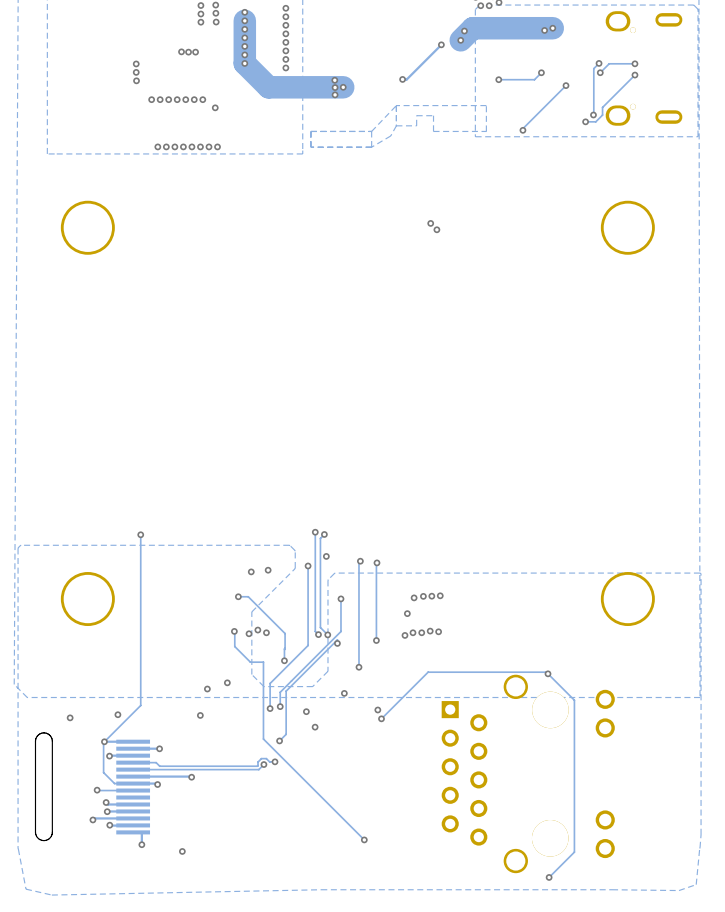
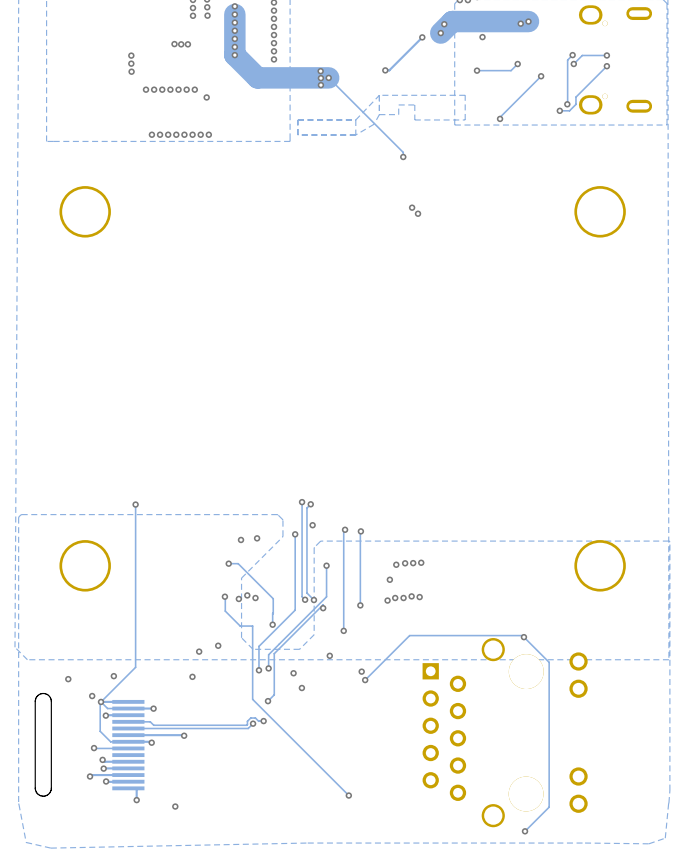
via: none -> (482, 37)
track: none -> (328, 77) (403, 152) (403, 156)
via: none -> (403, 156)
via: none -> (92, 696)
track: none -> (101, 701) (107, 708) (128, 708)

